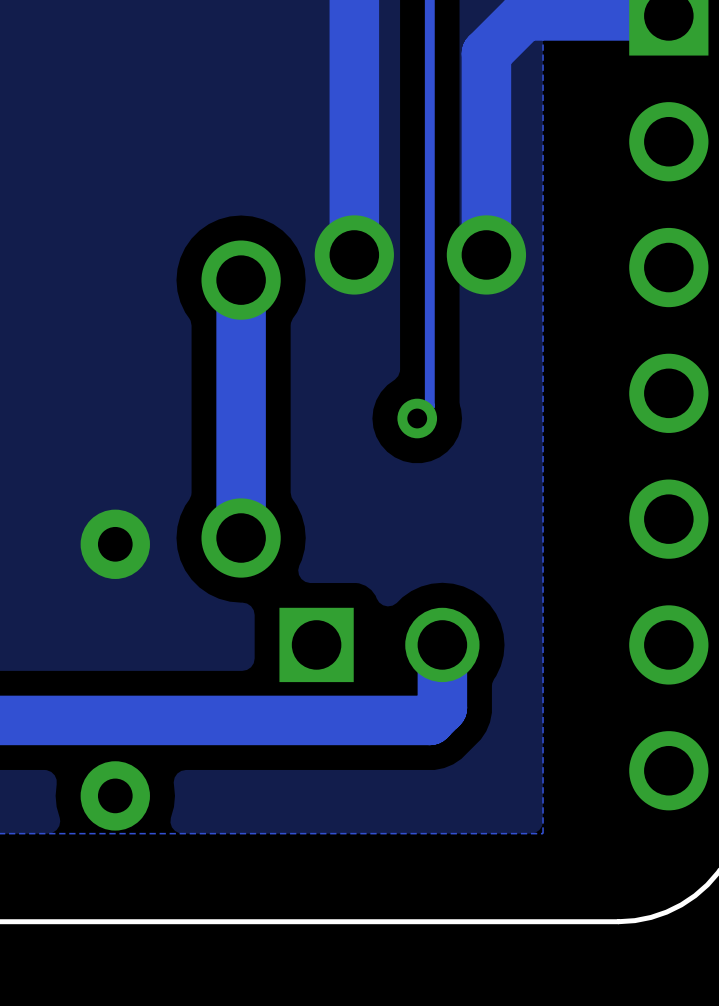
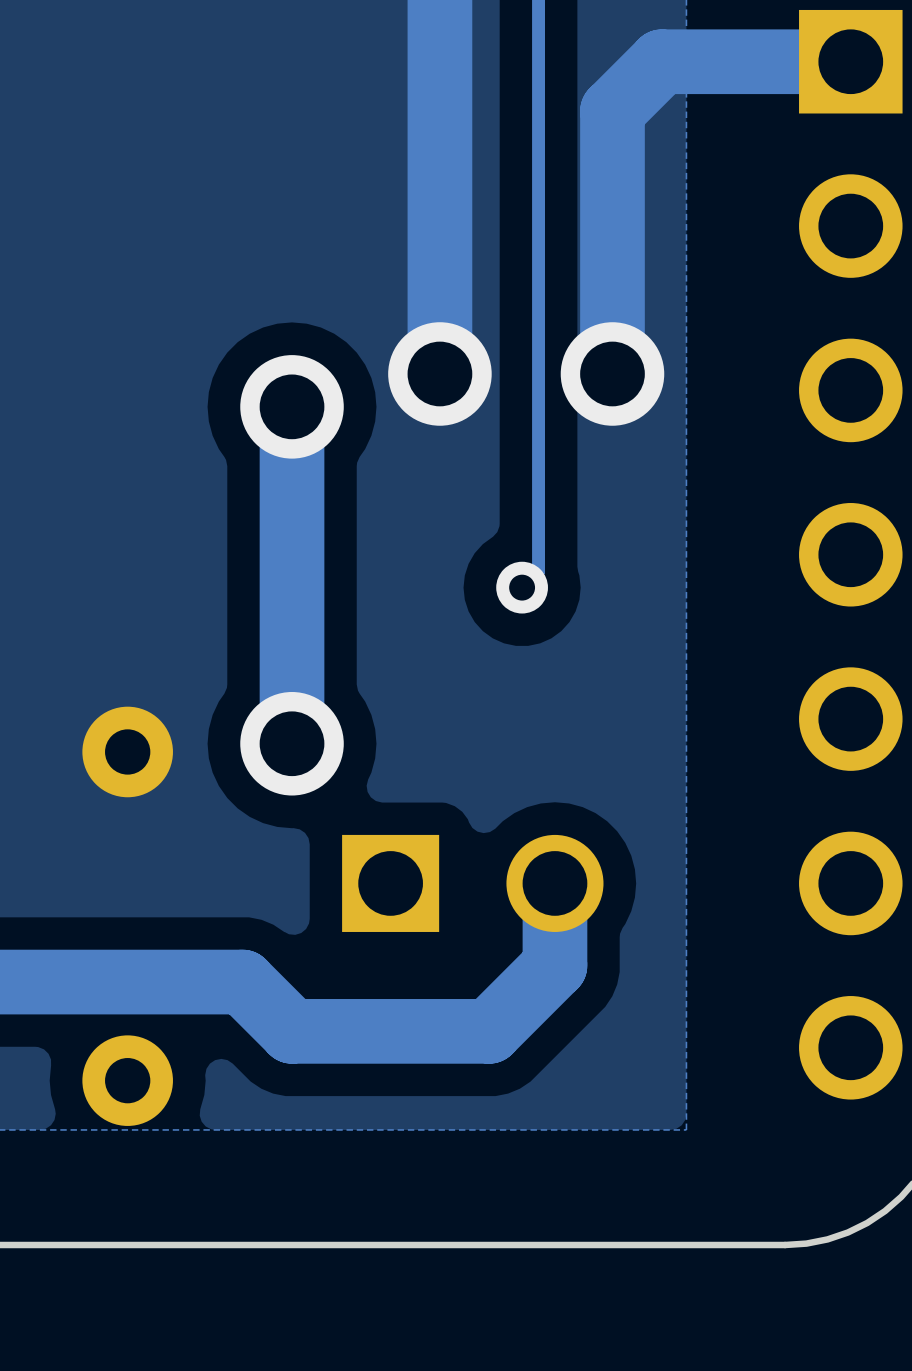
track: (429, 720) (203, 720) -> (538, 982) (489, 1031) (292, 1031) (242, 982)

